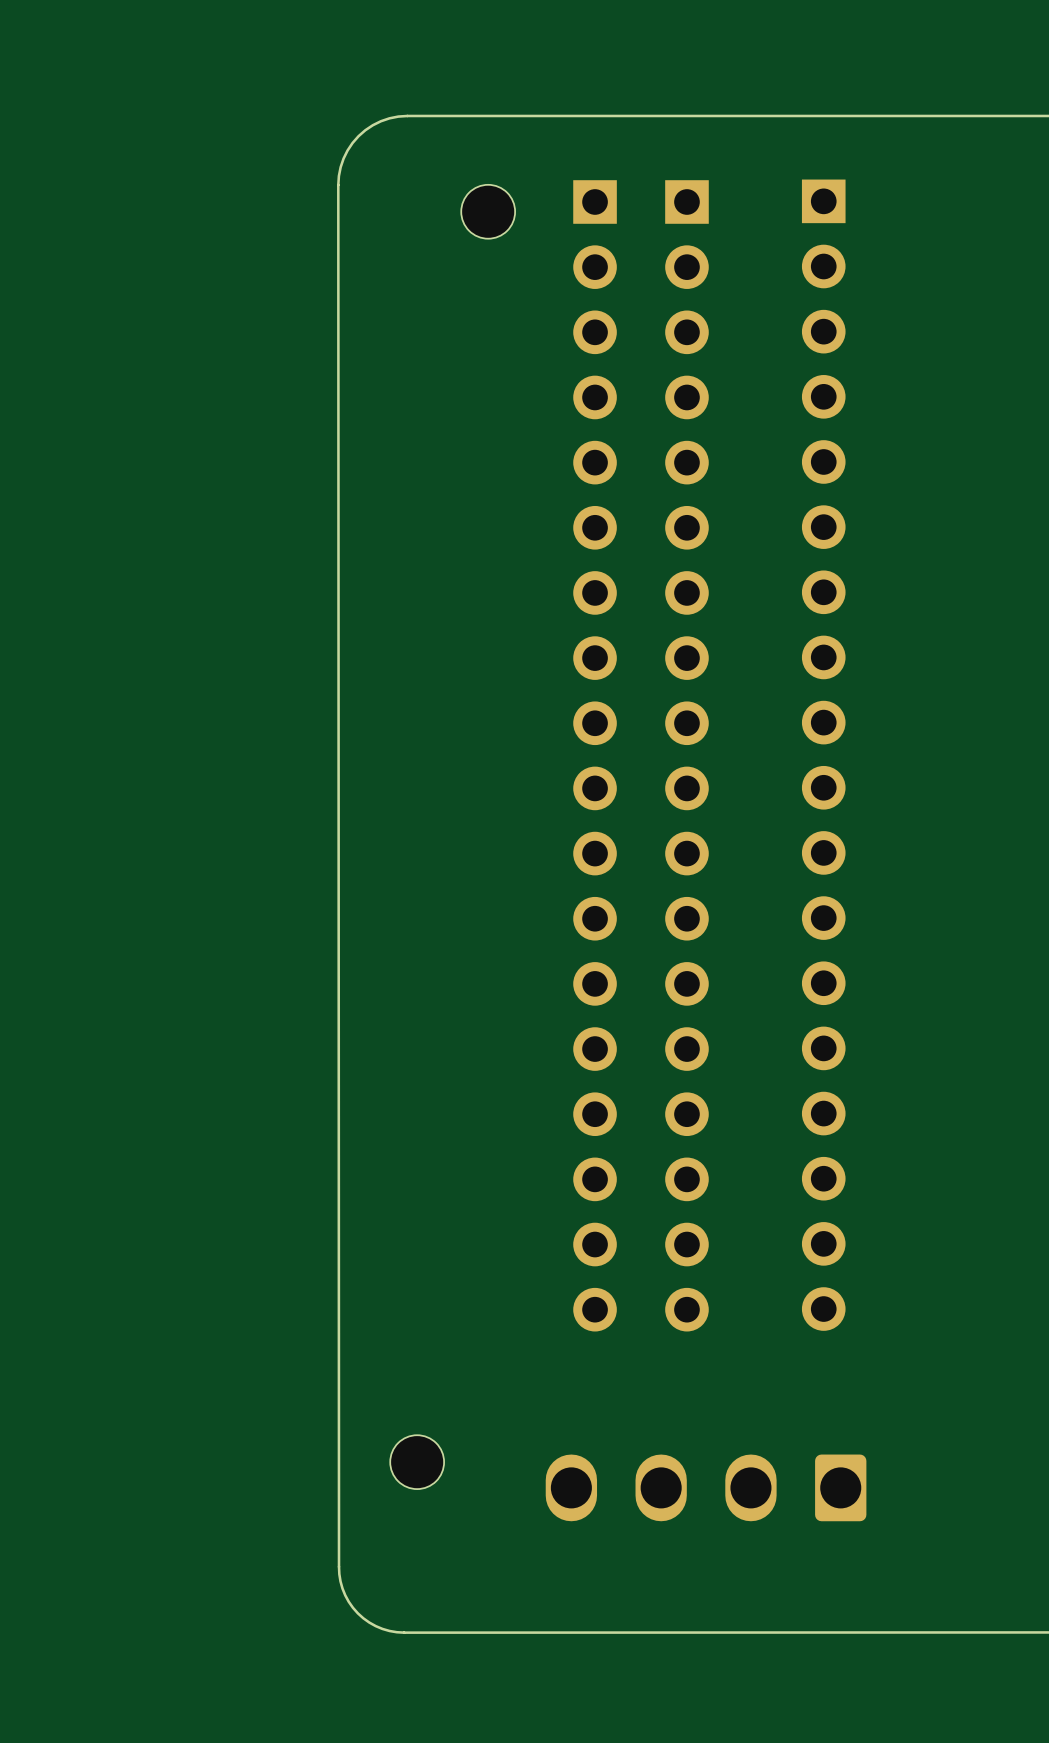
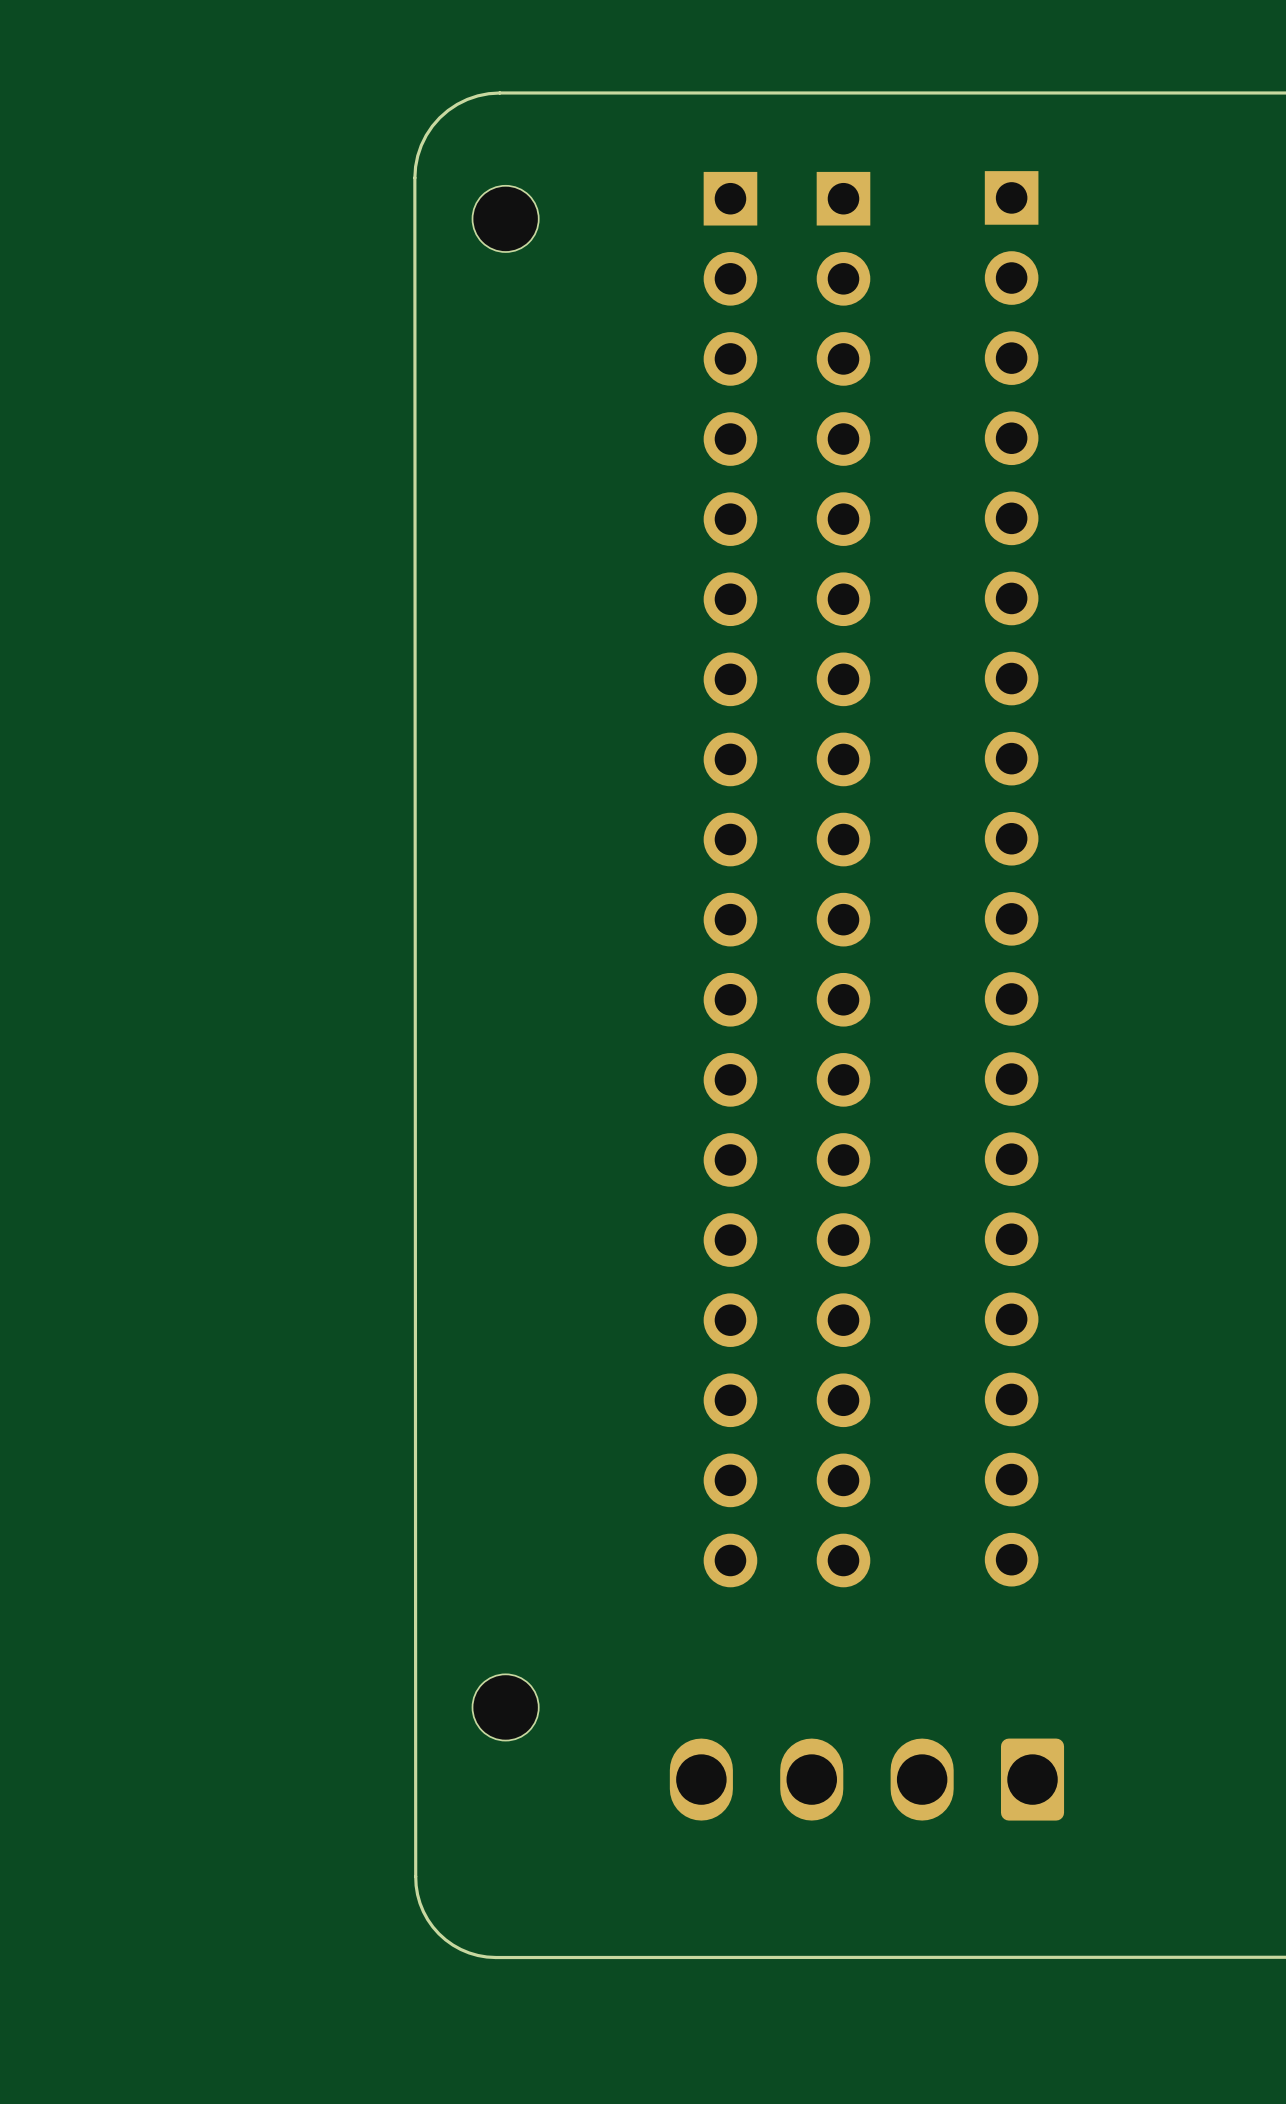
part position: (488, 211) -> (505, 218)
part position: (417, 1462) -> (505, 1707)

